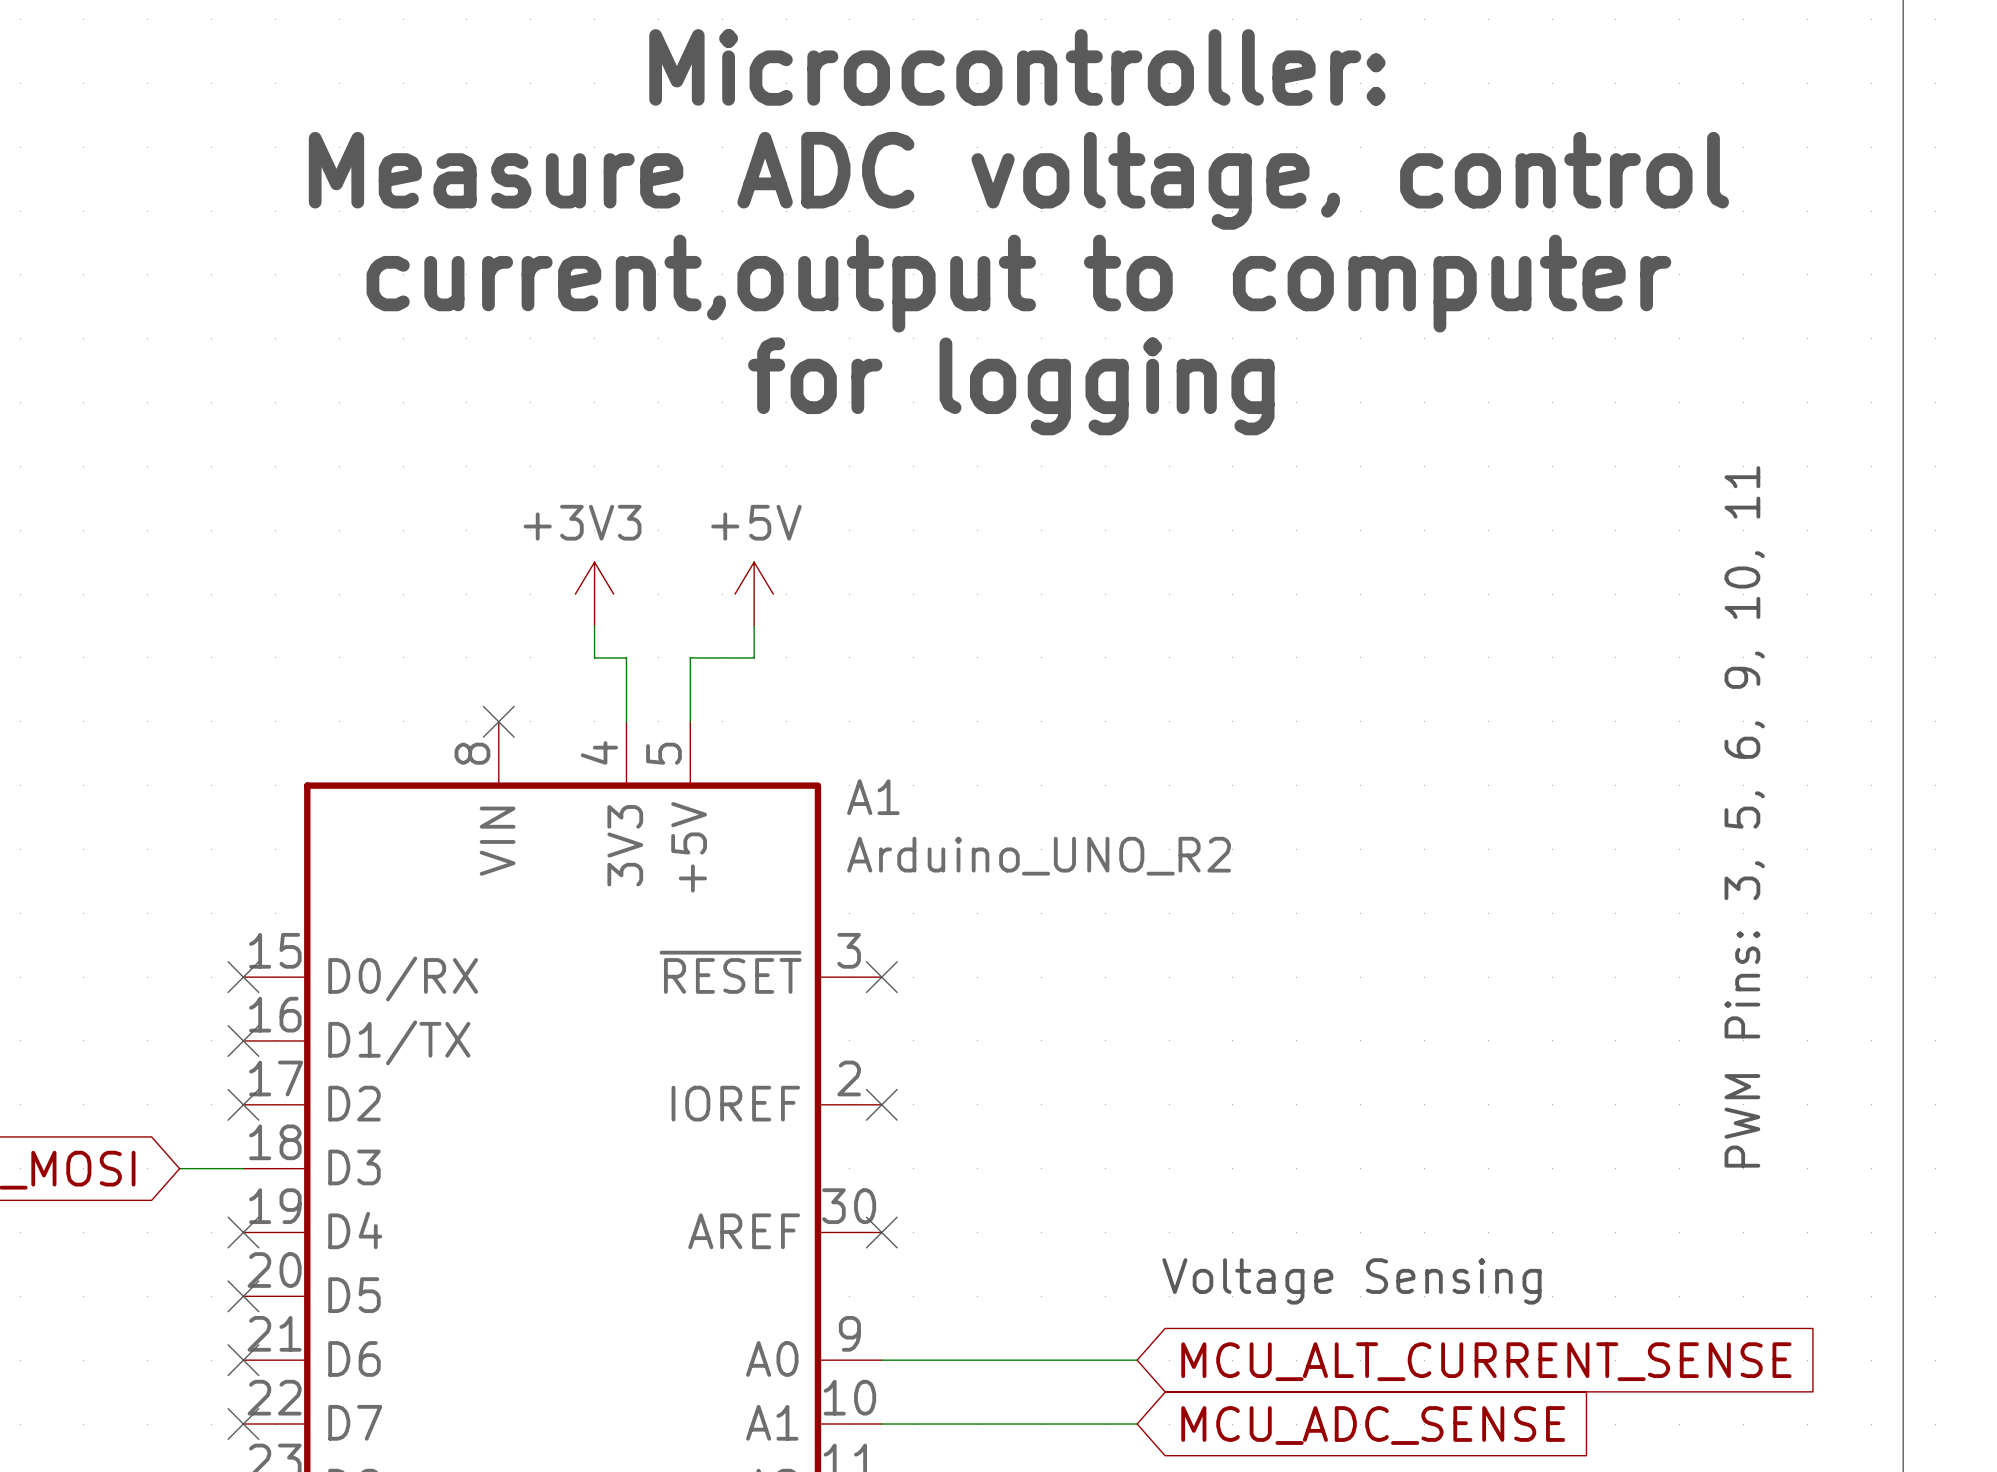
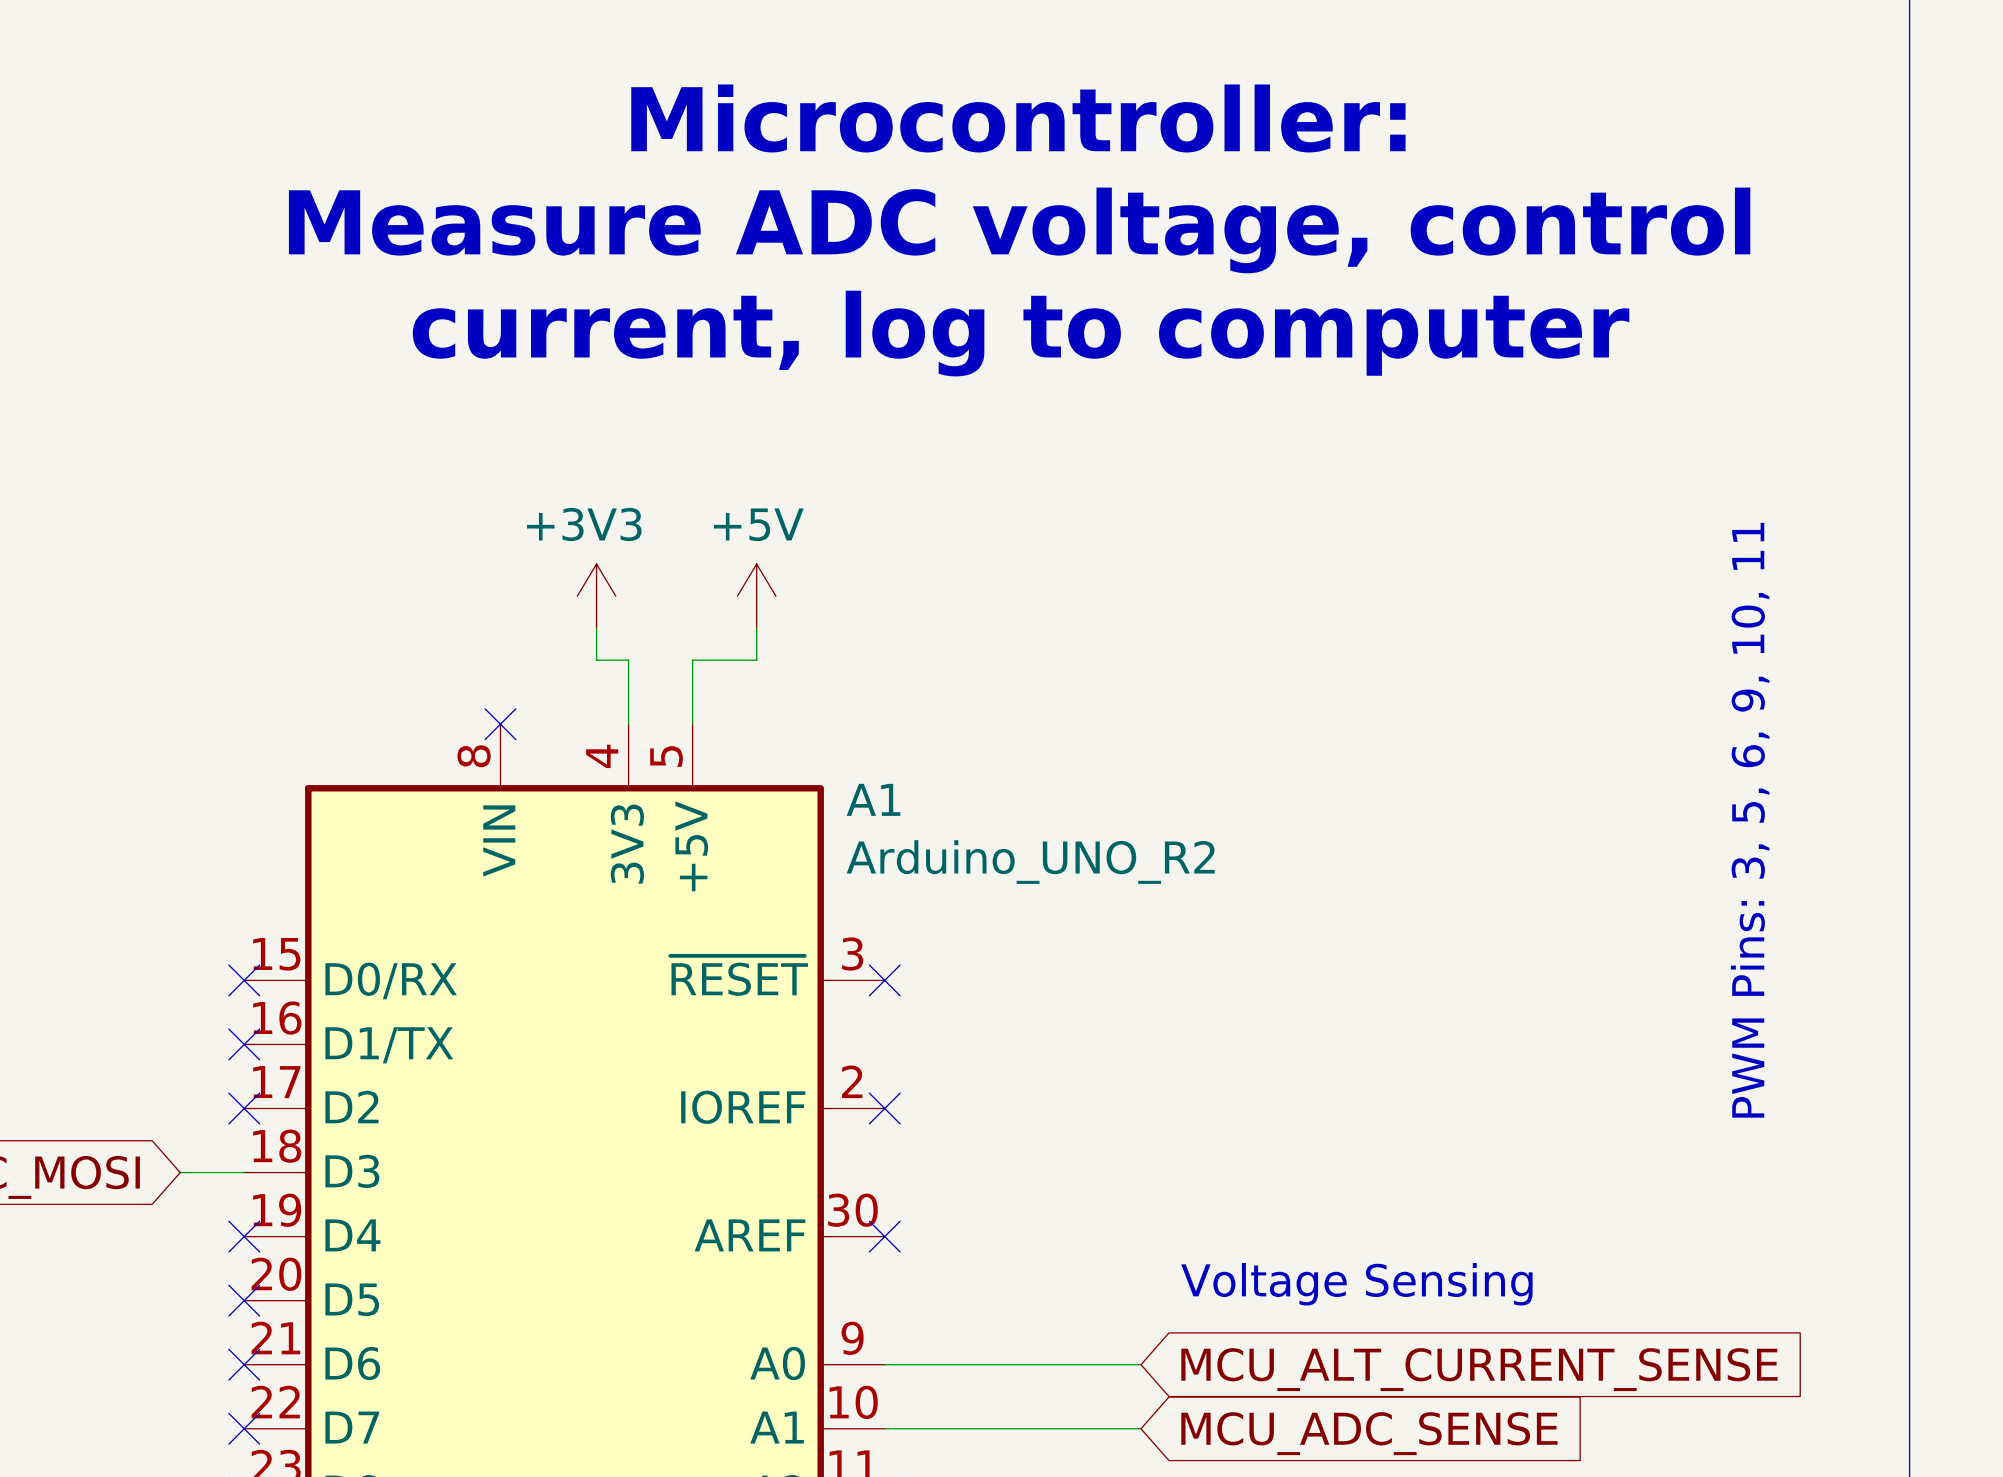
text position: Microcontroller: (1017, 67) -> Microcontroller: (1018, 118)
text position: Measure ADC voltage, control (1018, 180) -> Measure ADC voltage, control (1019, 230)
text: current,output to computer (1018, 283) -> current, log to computer (1021, 333)
text: for logging (1011, 386) -> none

